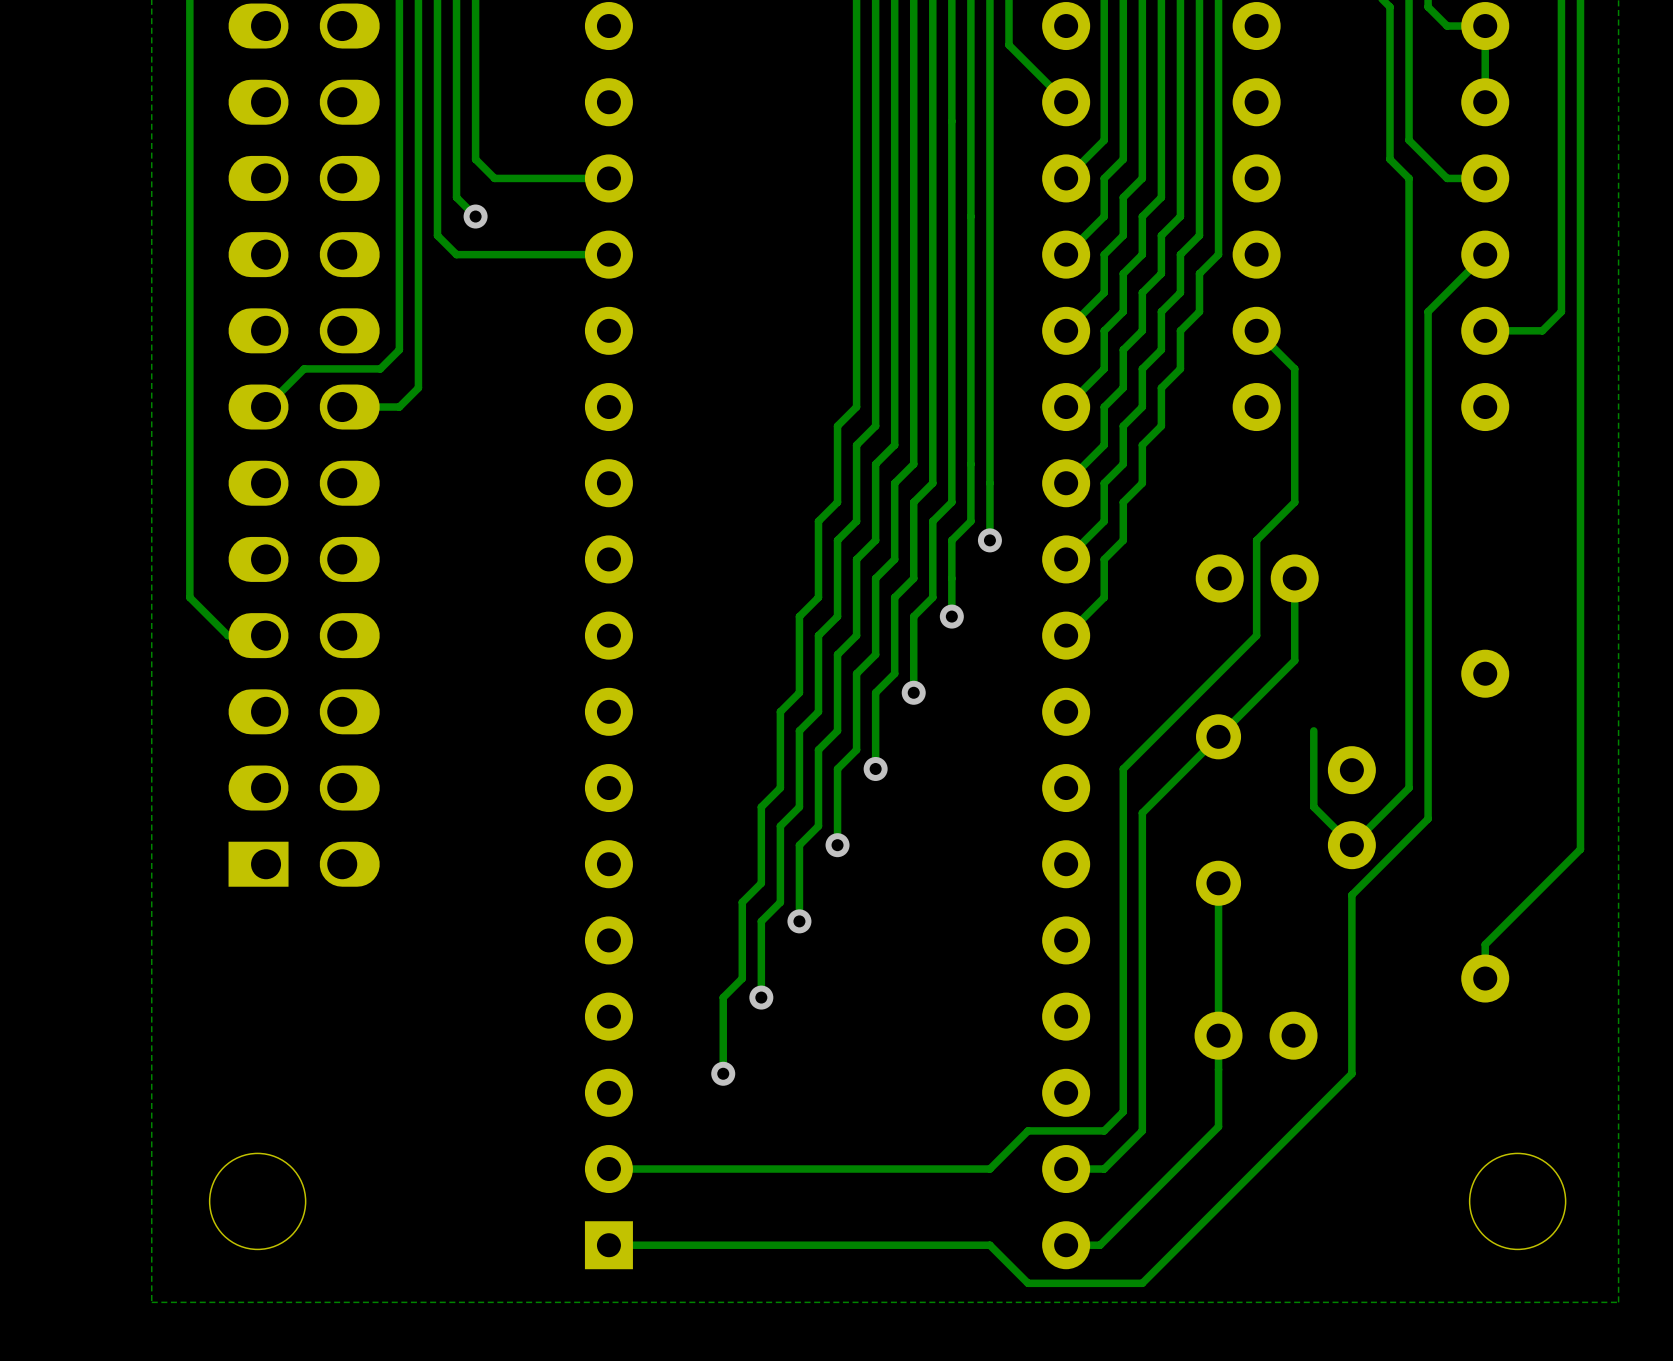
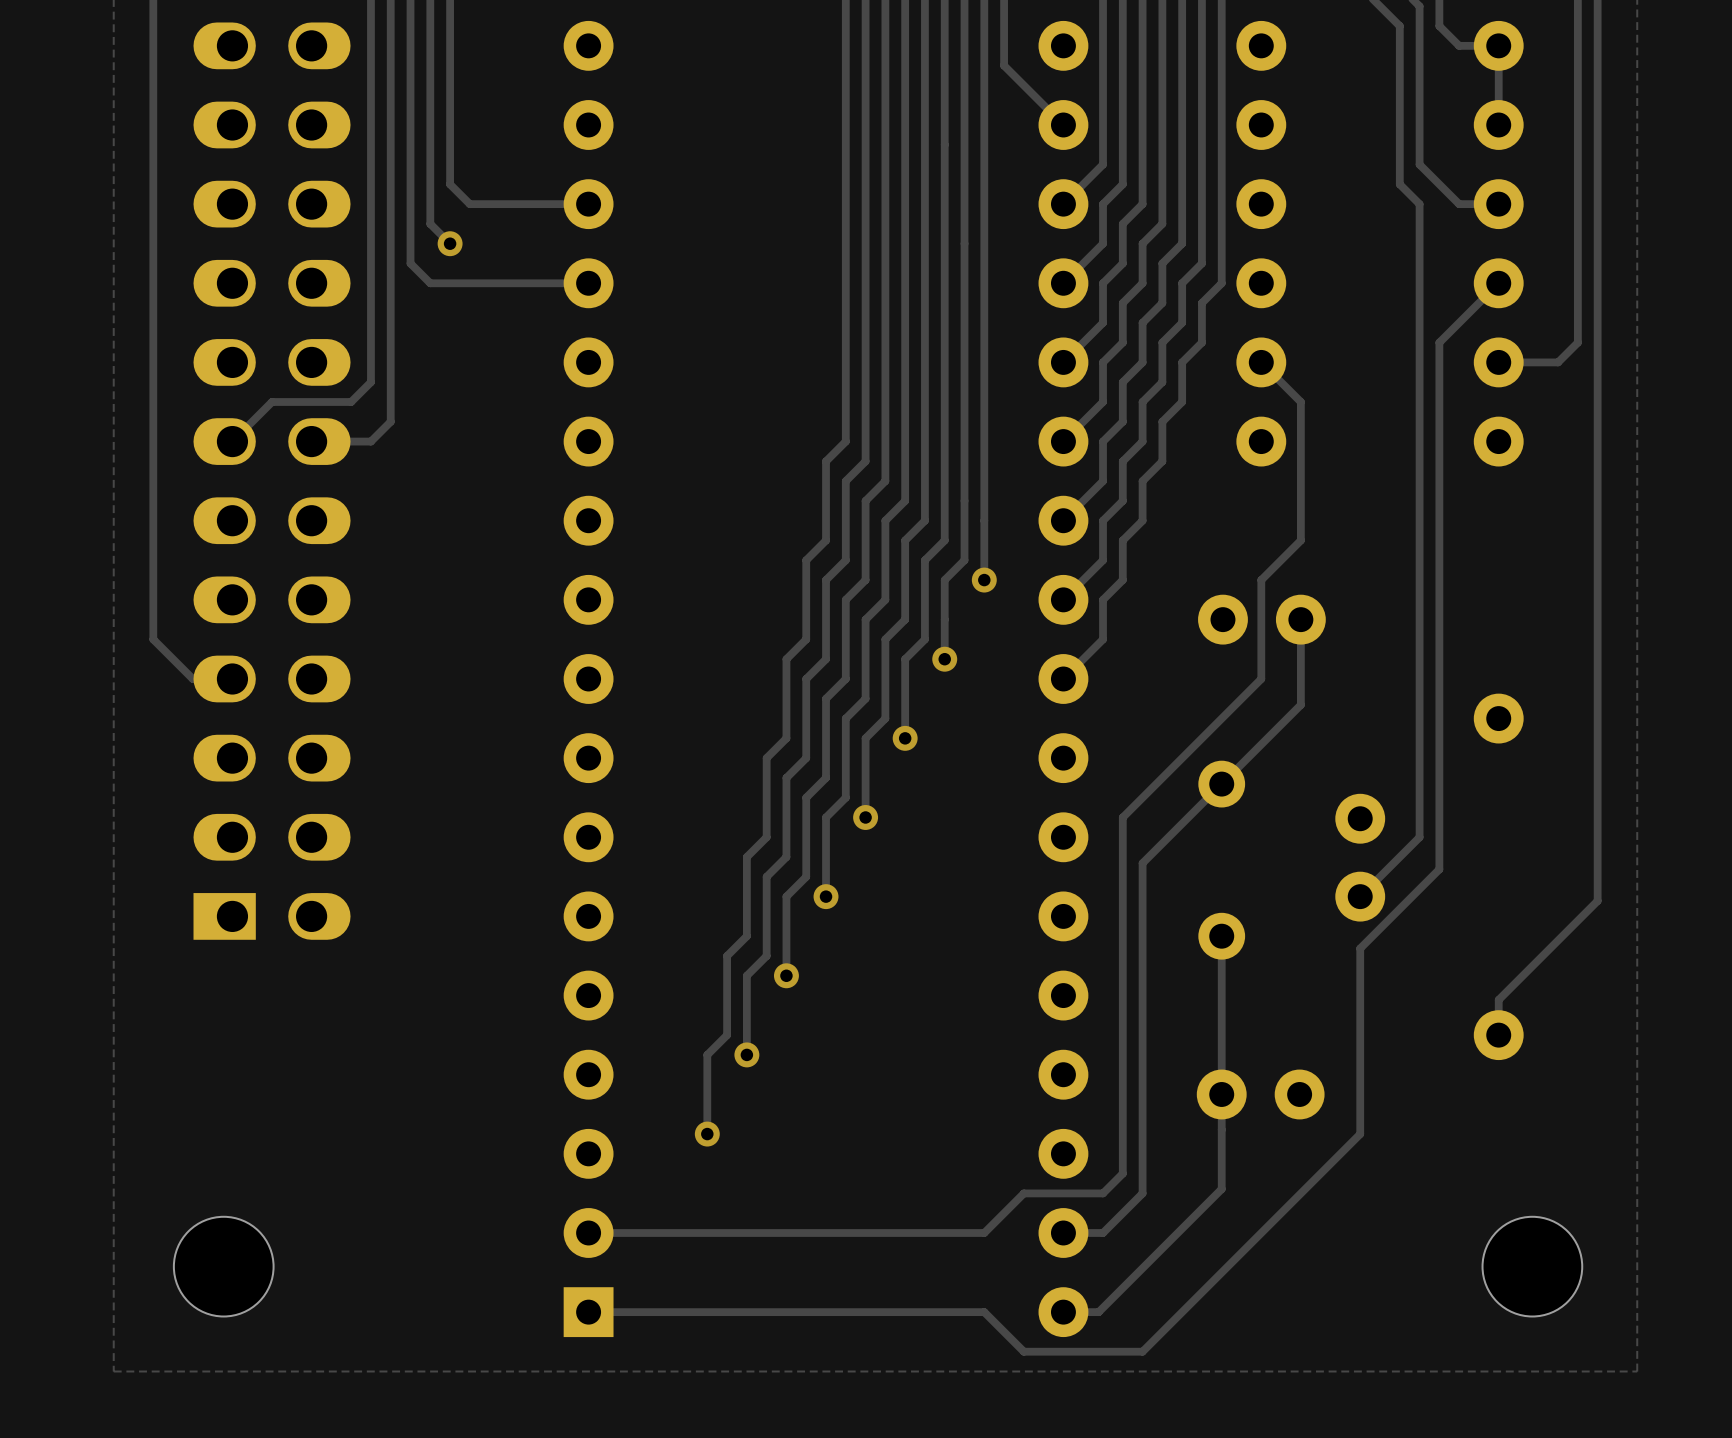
track: (1313, 730) (1313, 807) (1351, 845) -> none

